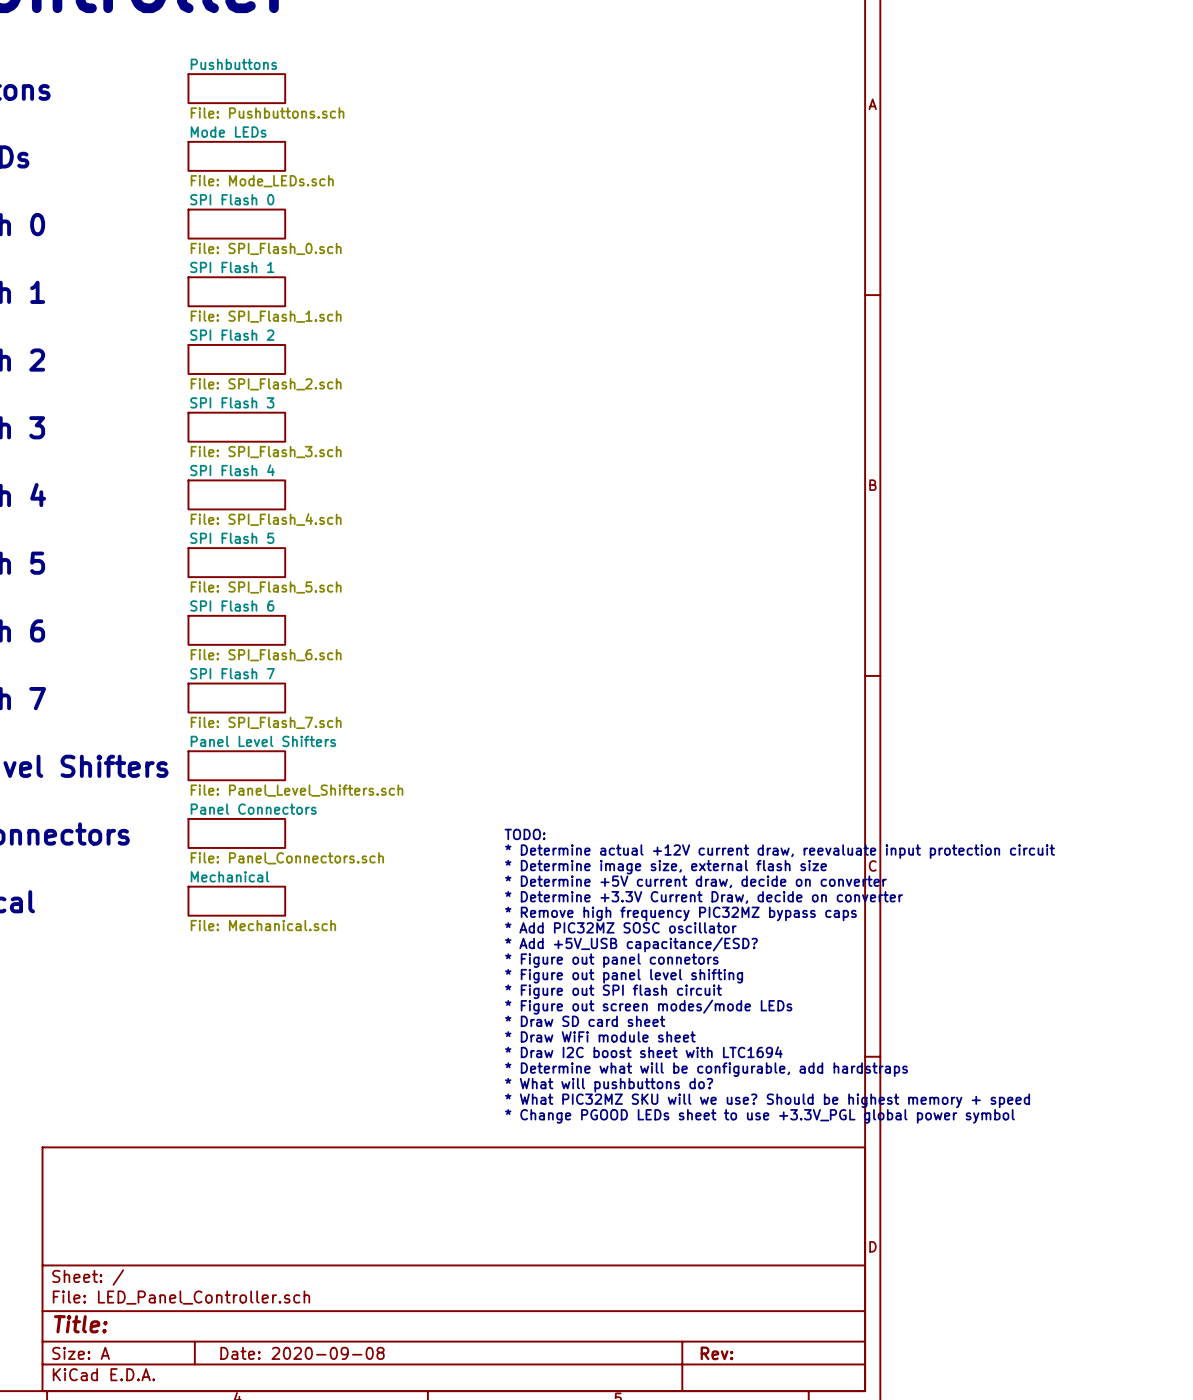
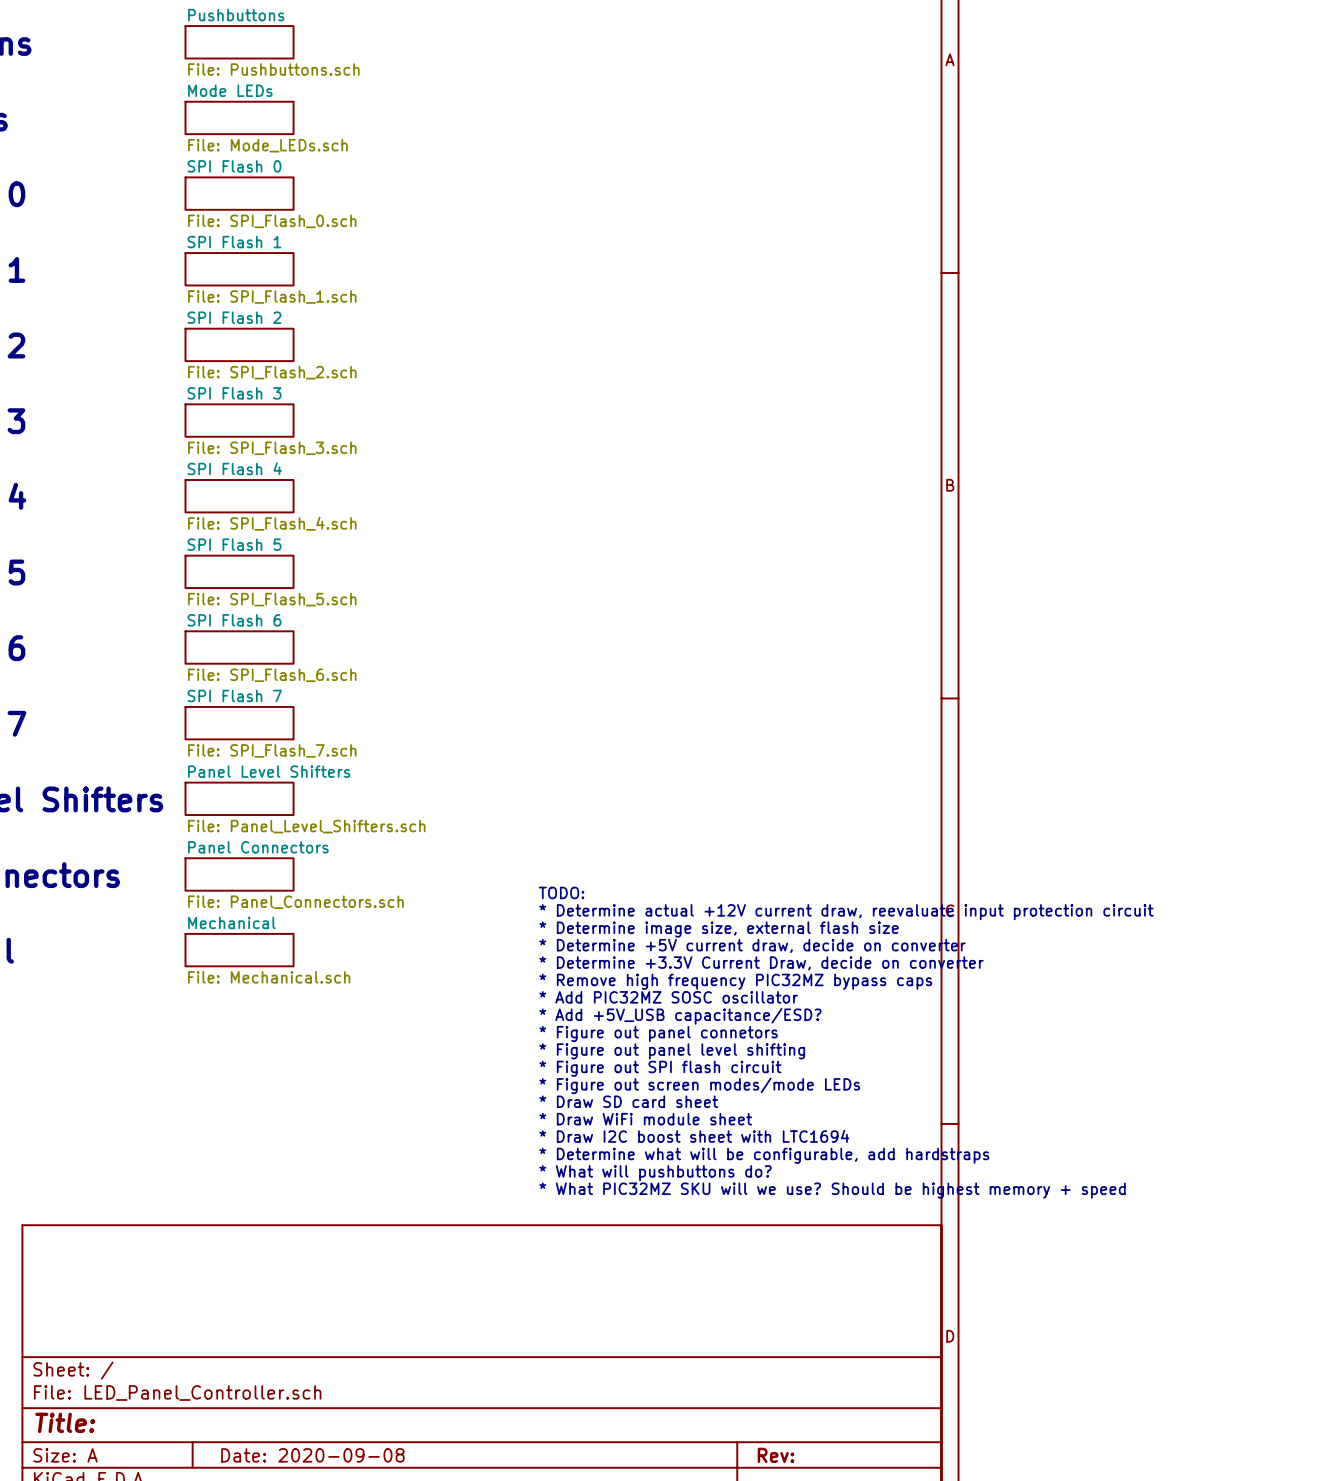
text: TODO: (525, 834) -> none
text: * Determine actual +12V current draw, reevaluate input protection circuit (780, 851) -> TODO: (561, 892)
text: * Determine image size, external flash size (666, 867) -> * Determine actual +12V current draw, reevaluate input protection circuit (846, 912)
text: * Determine +5V current draw, decide on converter (695, 881) -> * Determine image size, external flash size (719, 929)
text: * Determine +3.3V Current Draw, decide on converter (704, 897) -> * Determine +5V current draw, decide on converter (752, 945)
text: * Remove high frequency PIC32MZ bypass caps (680, 913) -> * Determine +3.3V Current Draw, decide on converter (761, 963)
text: * Add PIC32MZ SOSC oscillator (620, 927) -> * Remove high frequency PIC32MZ bypass caps (735, 981)
text: * Add +5V_USB capacitance/ESD? (631, 944) -> * Add PIC32MZ SOSC oscillator (668, 997)
text: * Figure out panel connetors (611, 960) -> * Add +5V_USB capacitance/ESD? (680, 1016)
text: * Figure out panel level shifting (624, 976) -> * Figure out panel connetors (658, 1033)
text: * Figure out SPI flash circuit (613, 991) -> * Figure out panel level shifting (672, 1051)
text: * Figure out screen modes/mode LEDs (648, 1007) -> * Figure out SPI flash circuit (660, 1068)
text: * Draw SD card sheet (585, 1021) -> * Figure out screen modes/mode LEDs (699, 1085)
text: * Draw WiFi module sheet (600, 1036) -> * Draw SD card sheet (628, 1101)
text: * Draw I2C boost sheet with LTC1694 (643, 1052) -> * Draw WiFi module sheet (645, 1119)
text: * Determine what will be configurable, add hardstraps (706, 1069) -> * Draw I2C boost sheet with LTC1694 (694, 1136)
text: * What will pushbuttons do? (609, 1085) -> * Determine what will be configurable, add hardstraps (764, 1155)
text: * What PIC32MZ SKU will we use? Should be highest memory + speed (767, 1100) -> * What will pushbuttons do? (655, 1173)
text: * Change PGOOD LEDs sheet to use +3.3V_PGL global power symbol (759, 1116) -> * What PIC32MZ SKU will we use? Should be highest memory + speed (832, 1190)

